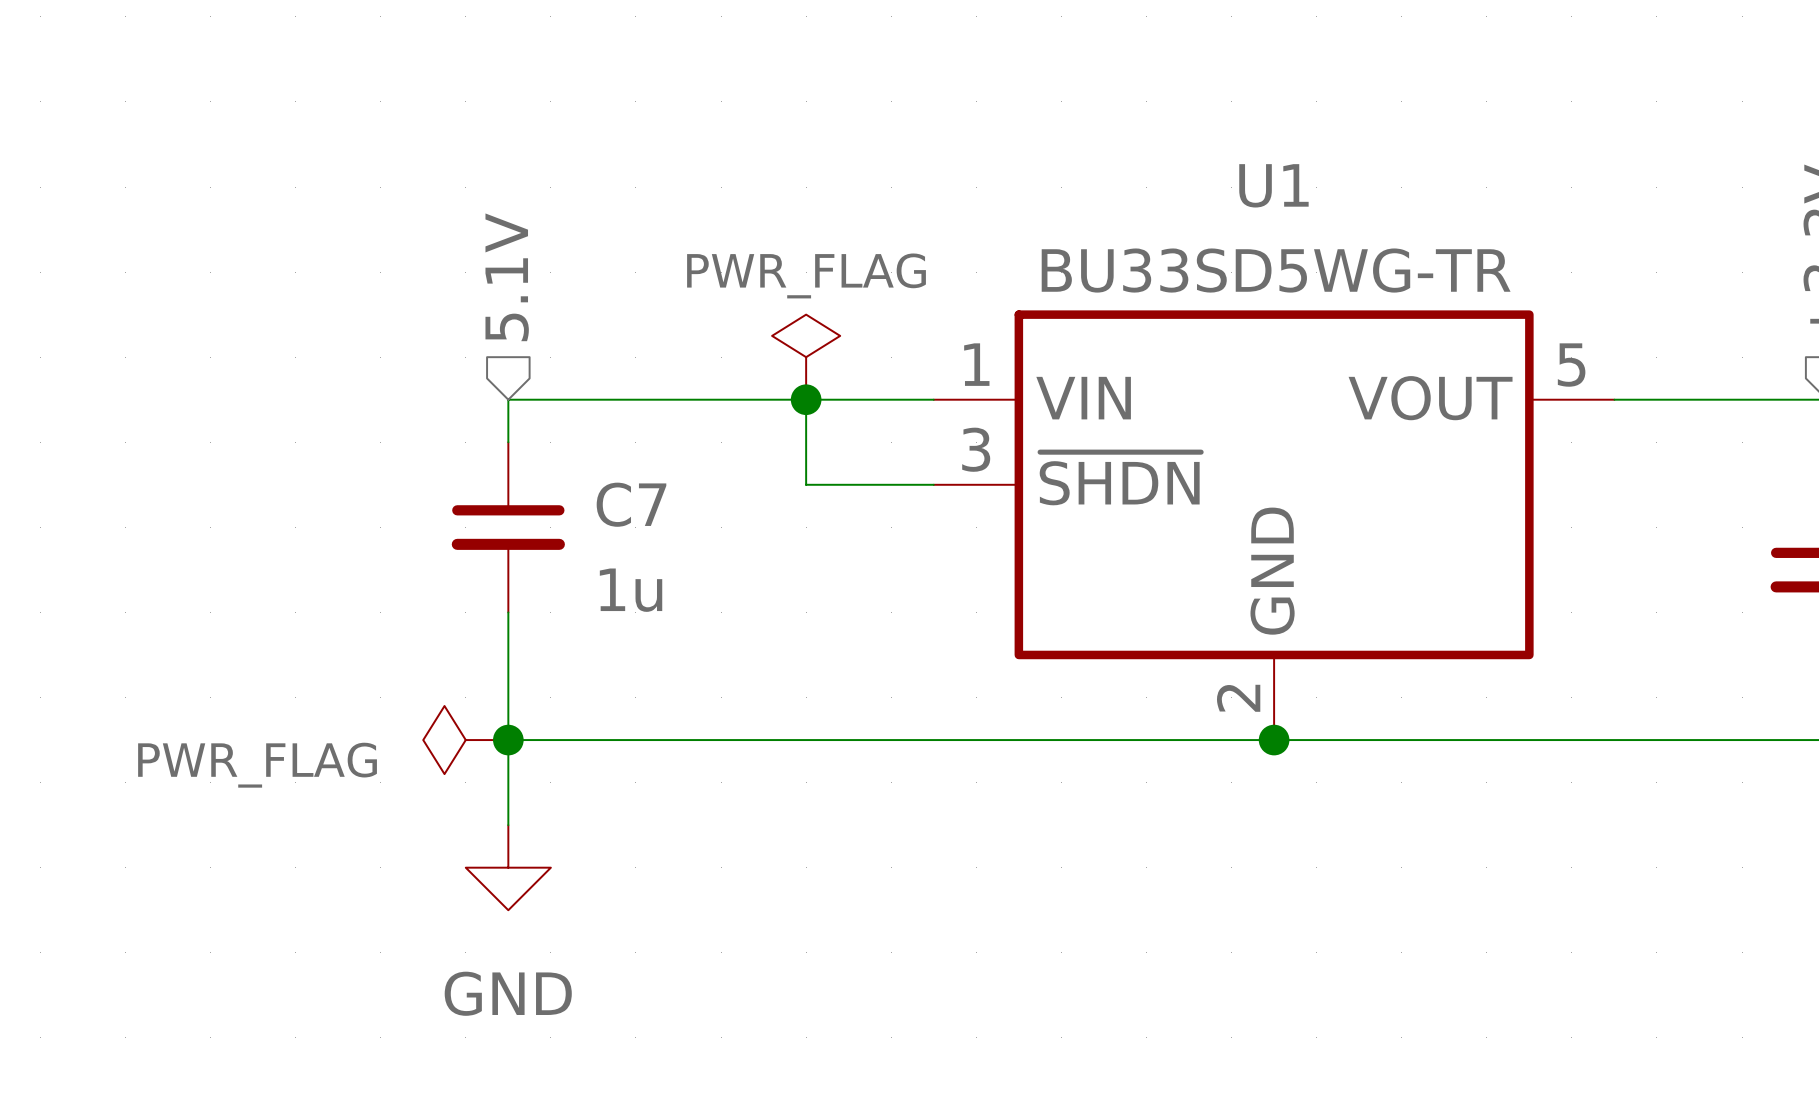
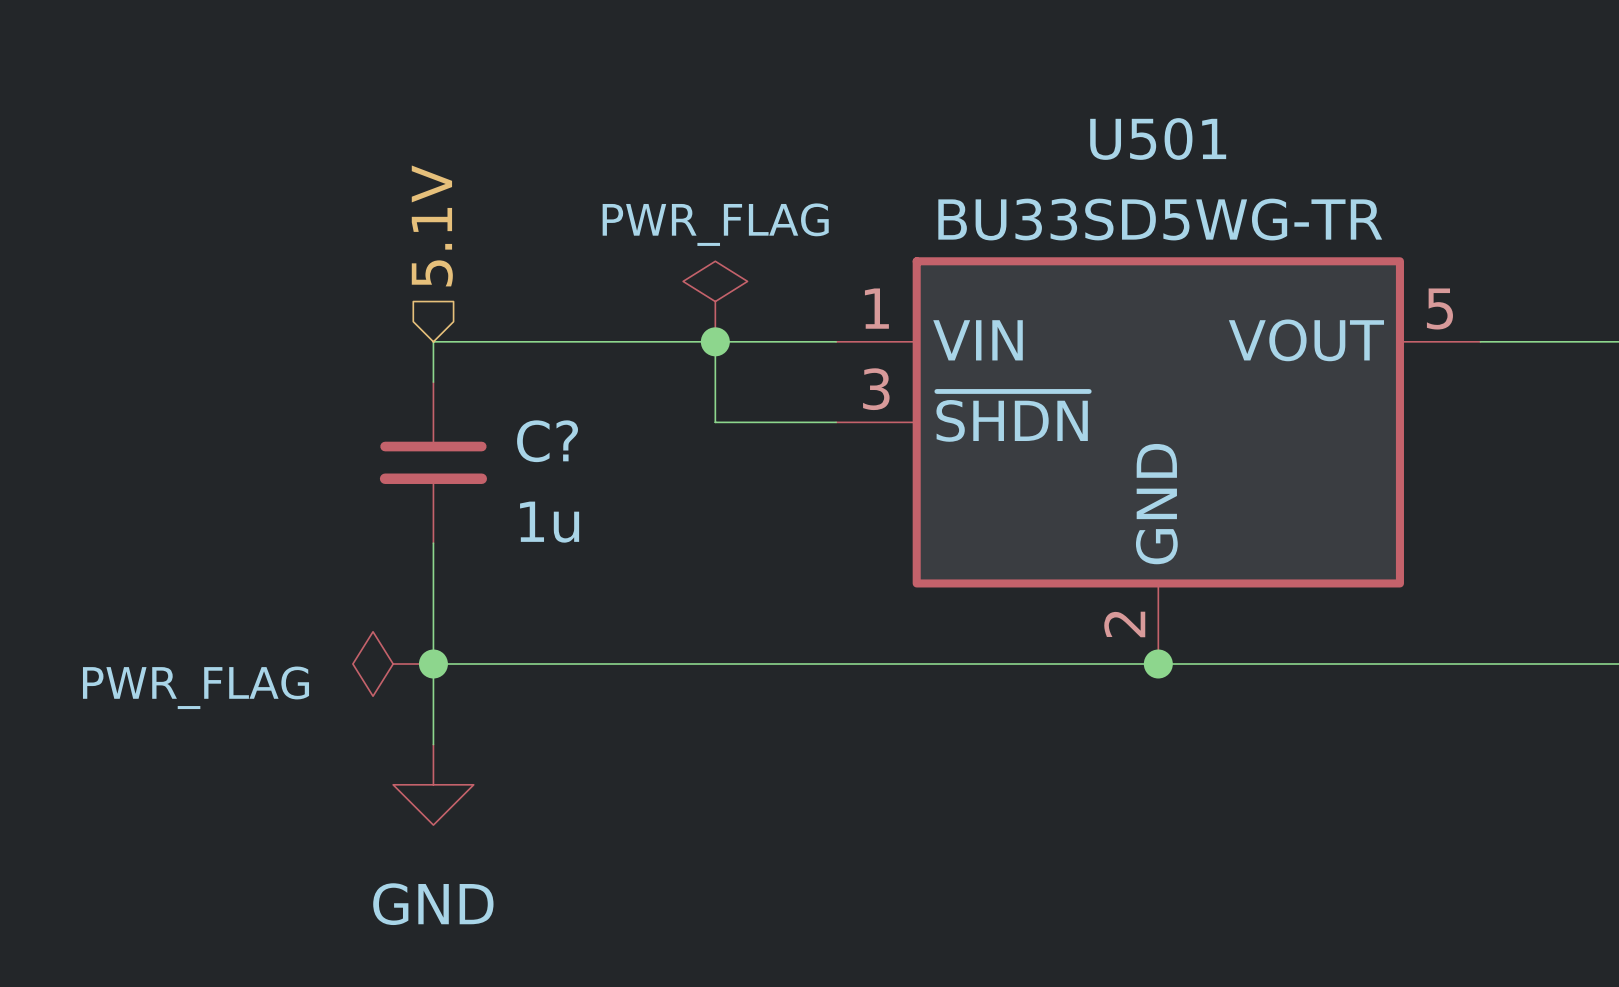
U1 name: U1 (1273, 185) -> U501 (1158, 138)
C7 name: C7 (631, 504) -> C? (547, 441)

